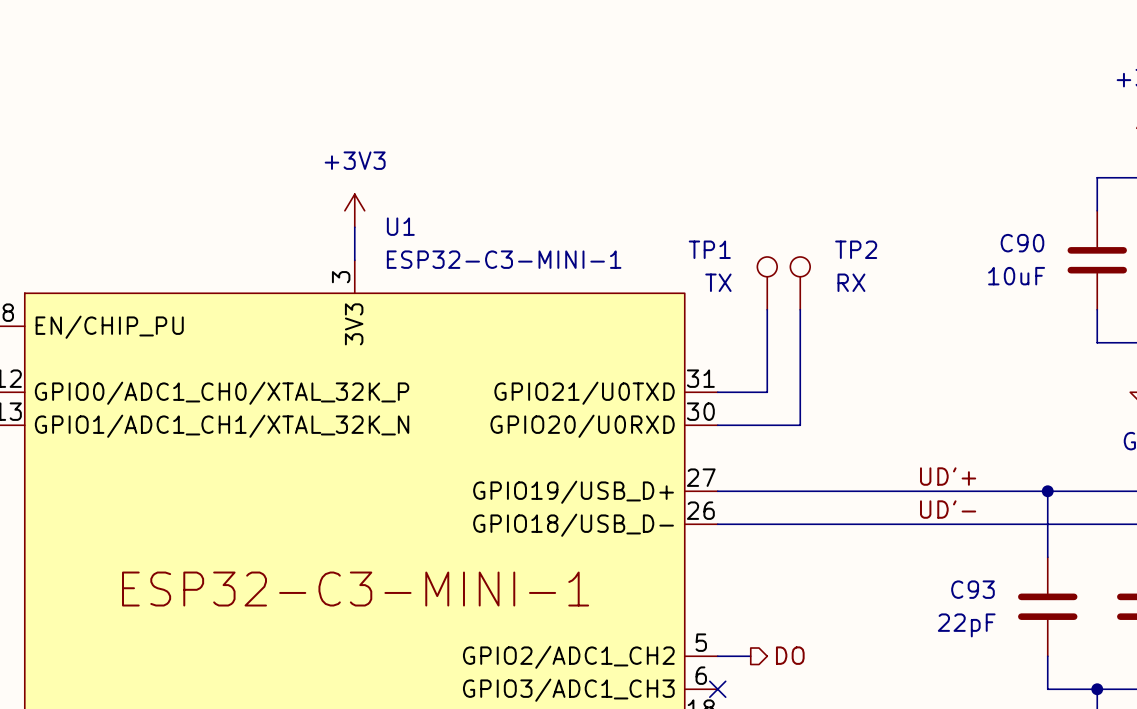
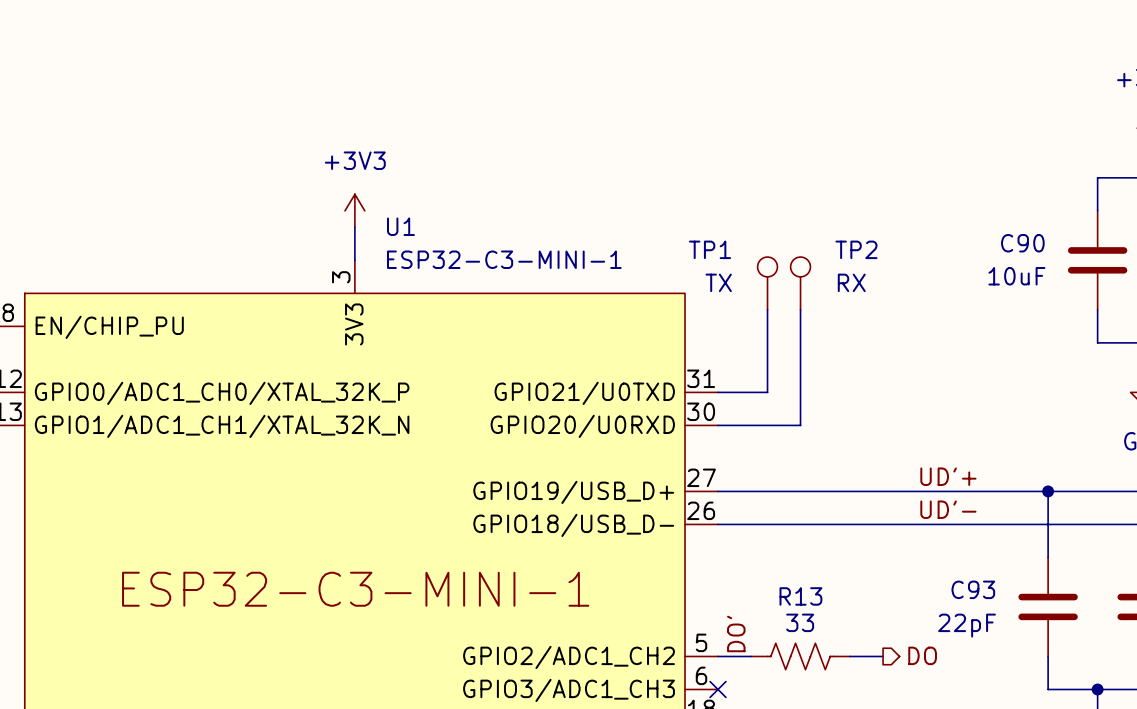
label: none -> DO' (736, 633)
hierarchical label position: DO (790, 655) -> DO (922, 655)
R13: none -> 33 (800, 656)
wire: none -> (850, 656) (883, 656)

